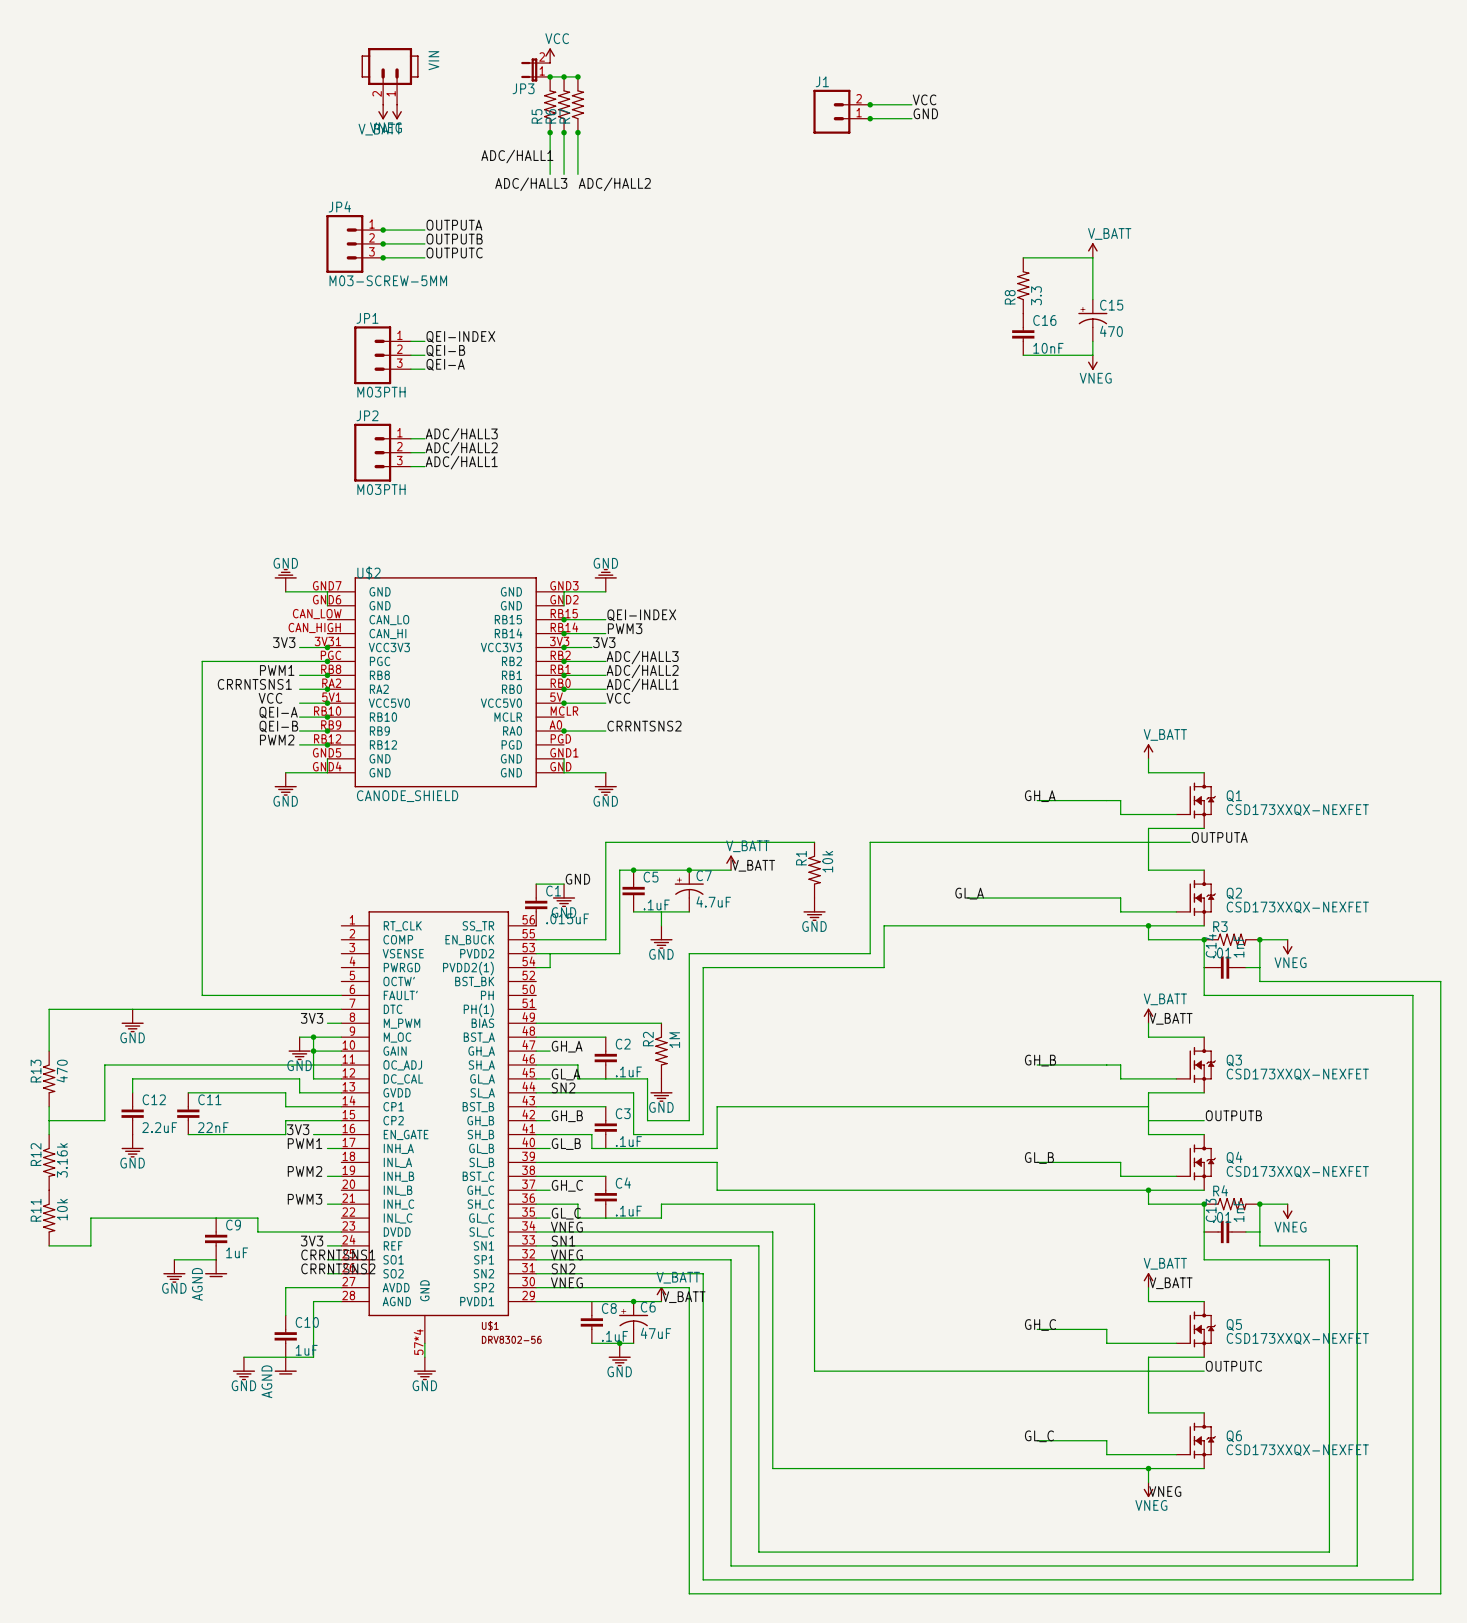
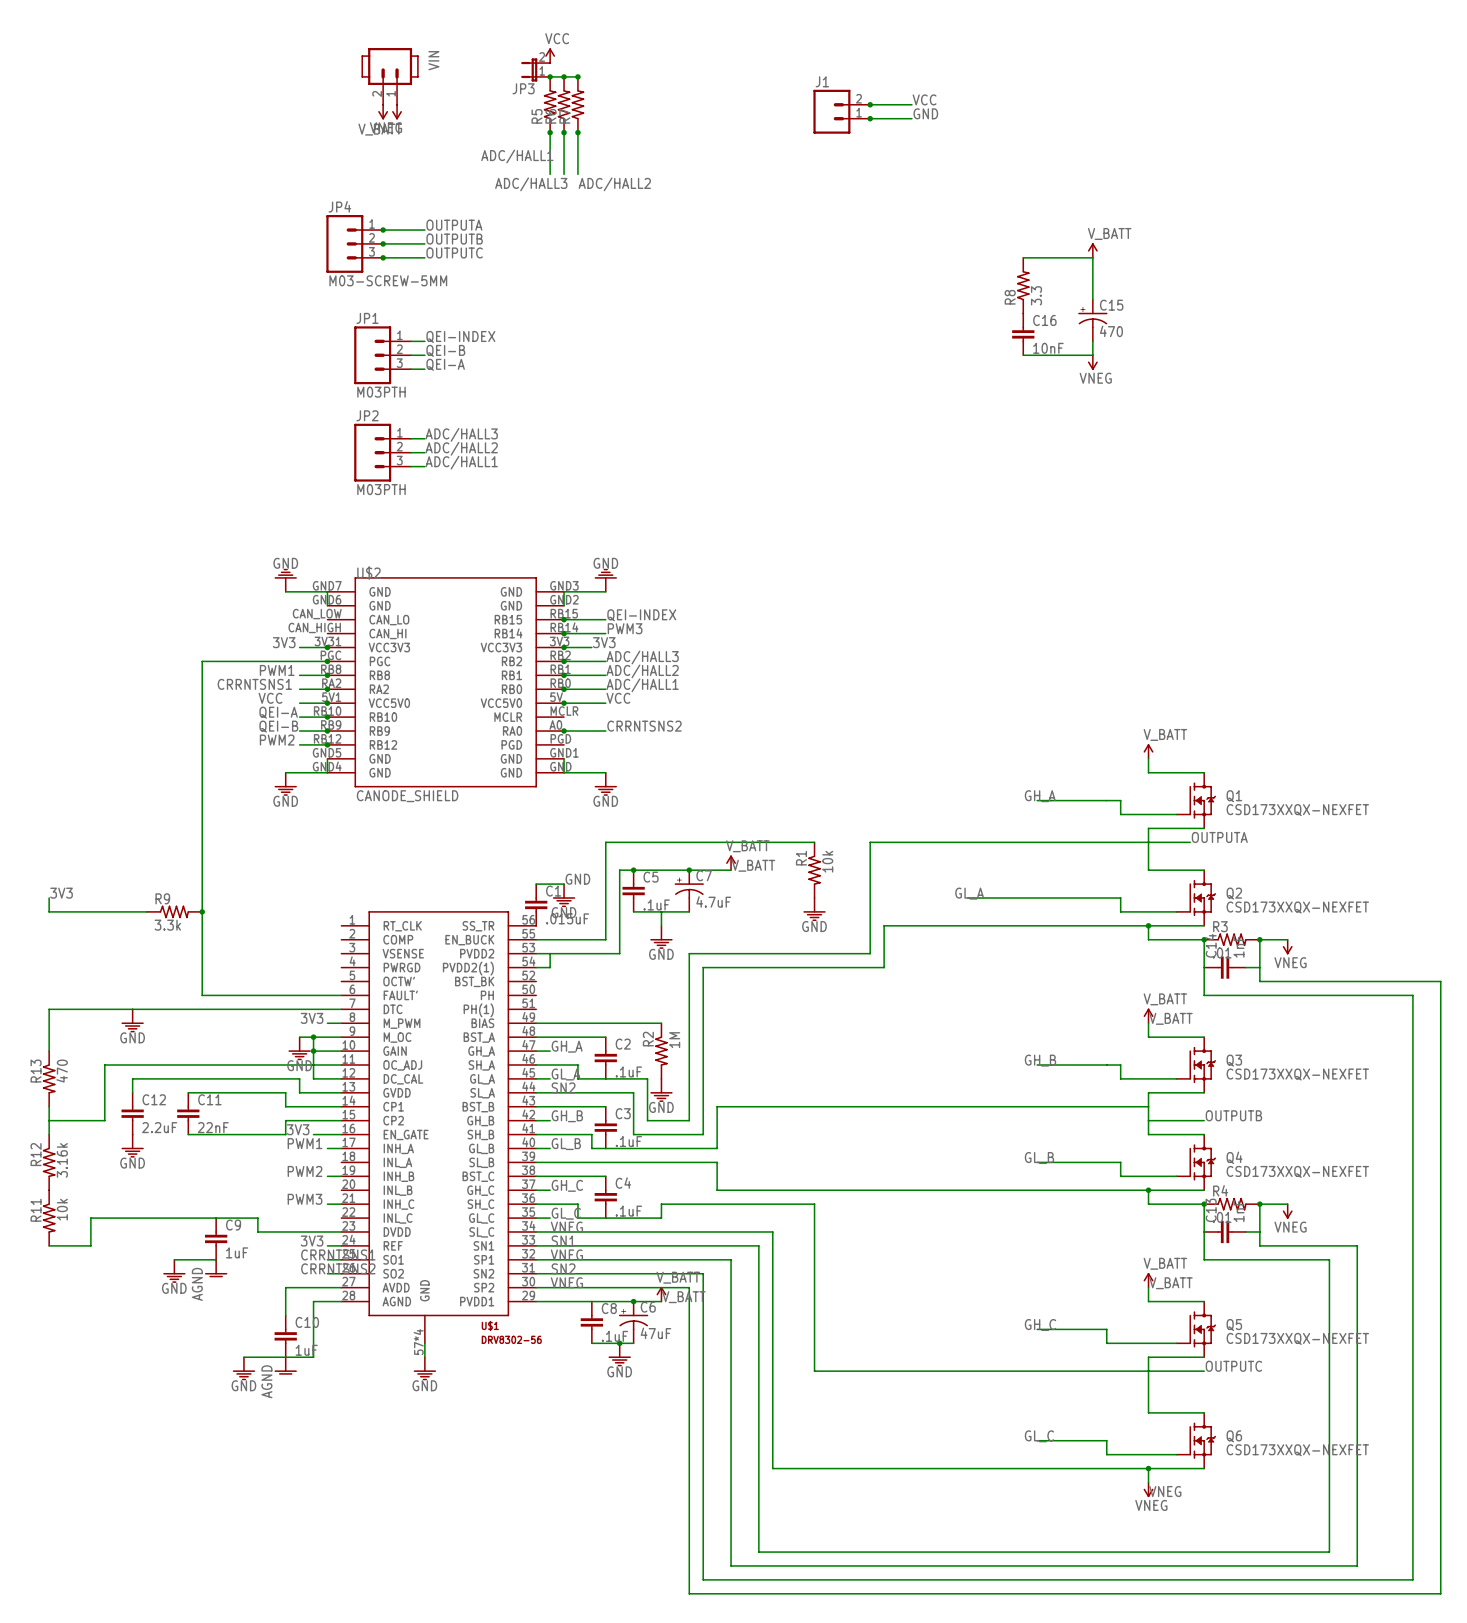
label: none -> 3V3 (61, 893)
wire: none -> (49, 898) (49, 911) (146, 911)
R9: none -> 3.3k (174, 911)
junction: none -> (202, 911)

